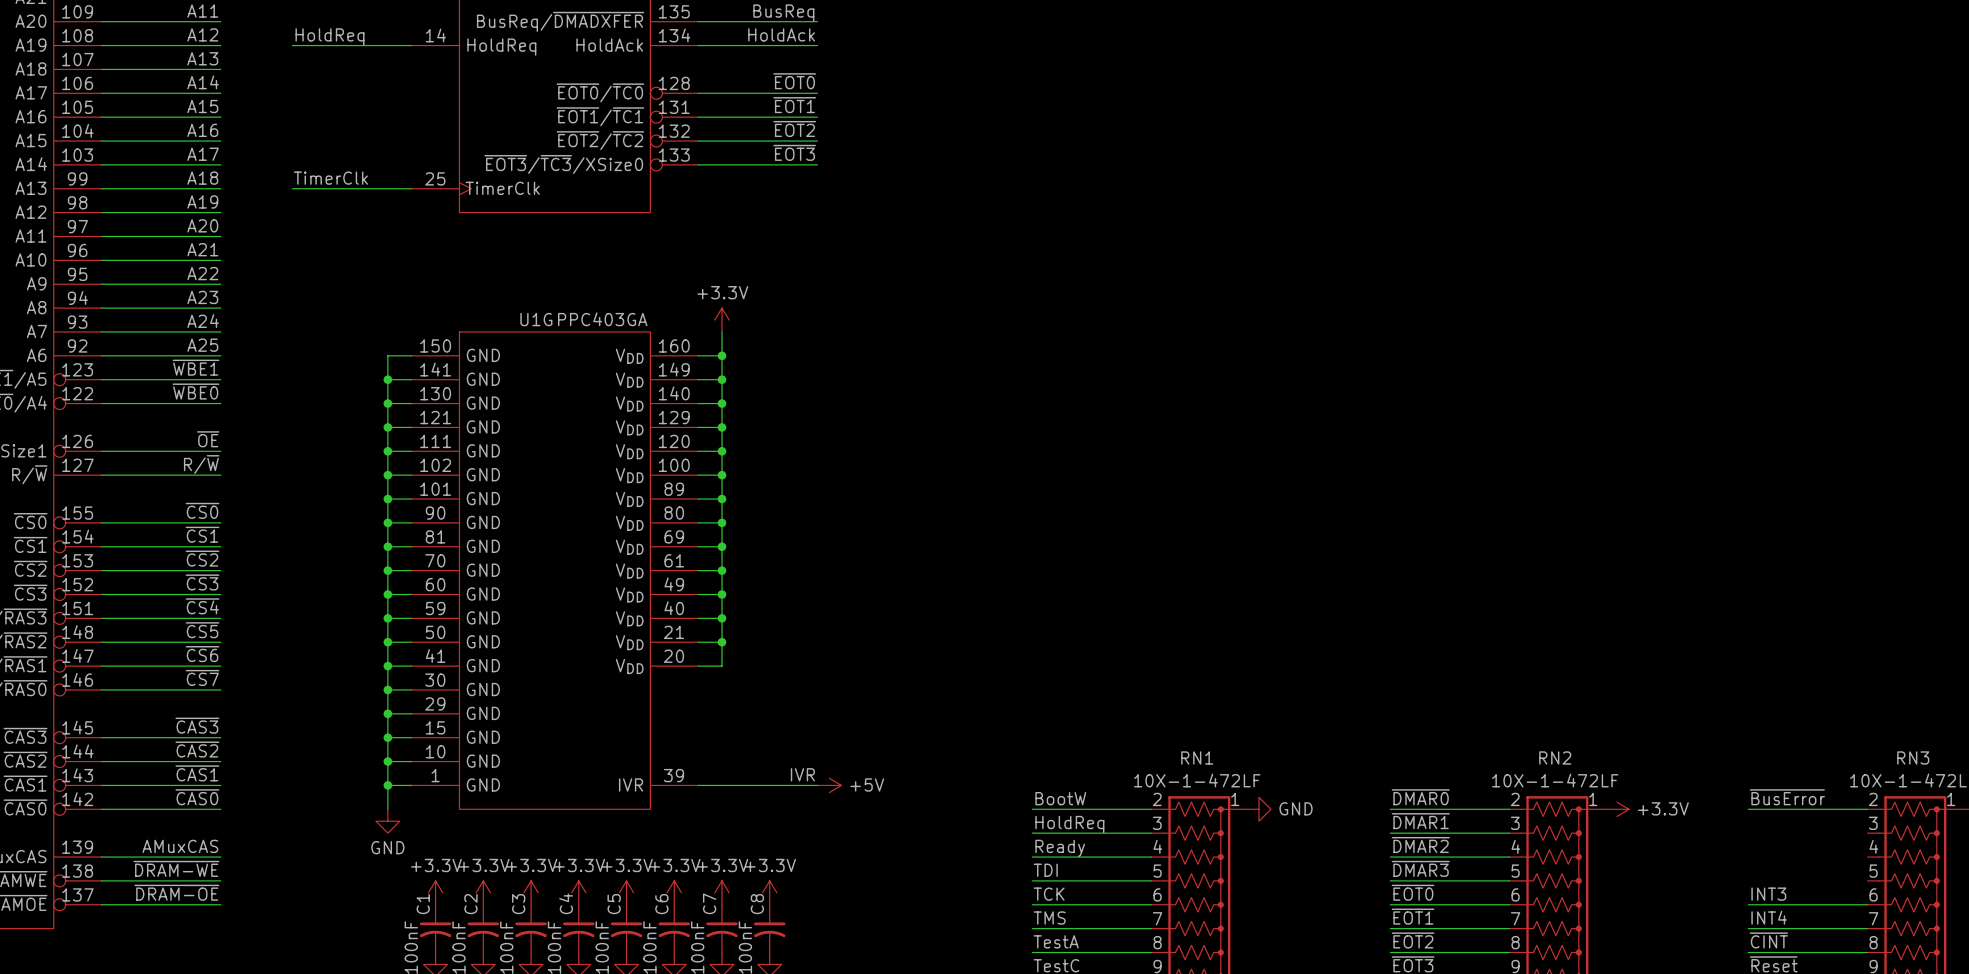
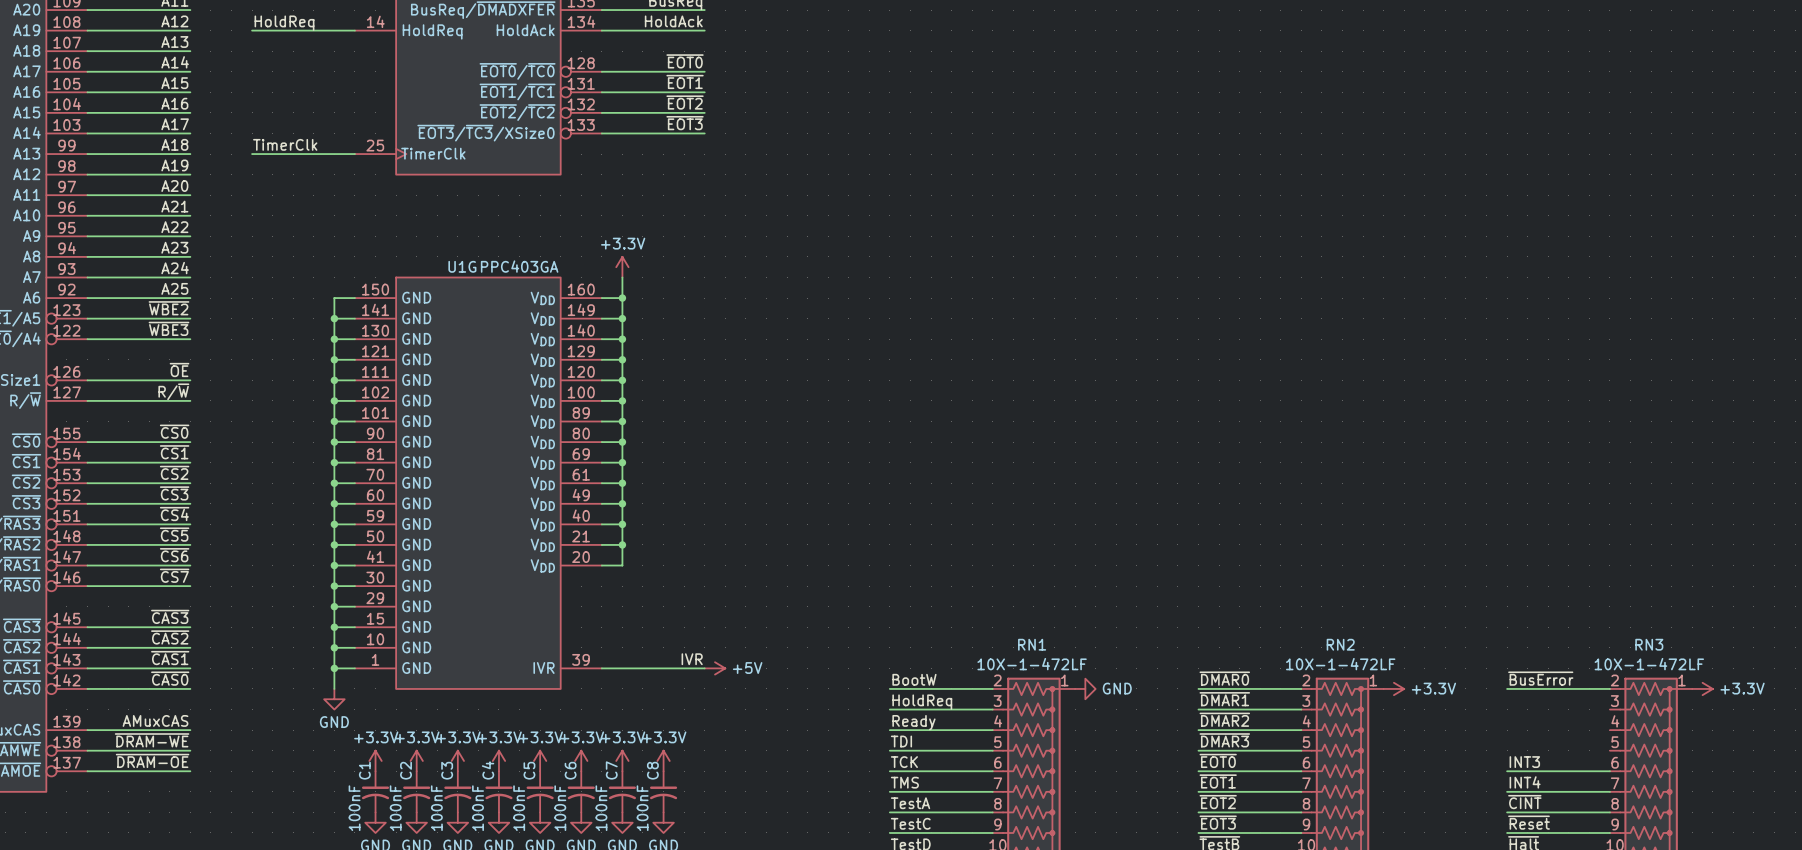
label: ~{WBE1} (195, 367) -> ~{WBE2} (168, 308)
label: ~{WBE0} (195, 391) -> ~{WBE3} (168, 328)

